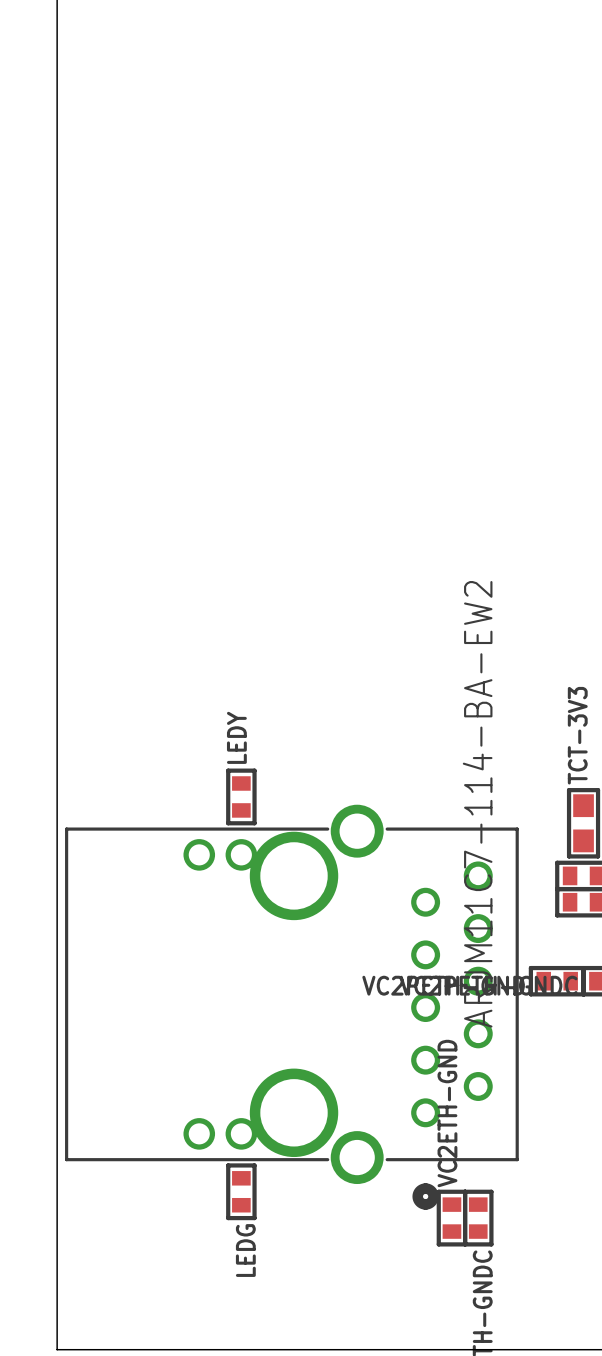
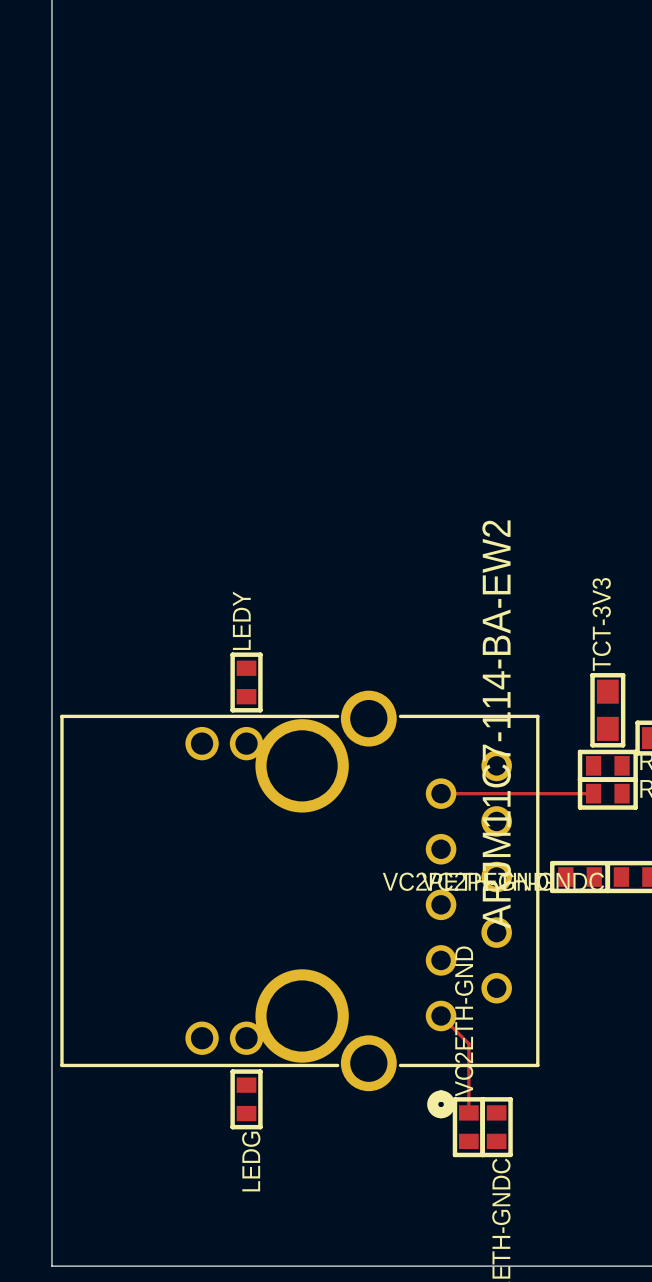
track: none -> (441, 793) (593, 793)
track: none -> (441, 1015) (468, 1043) (468, 1112)

